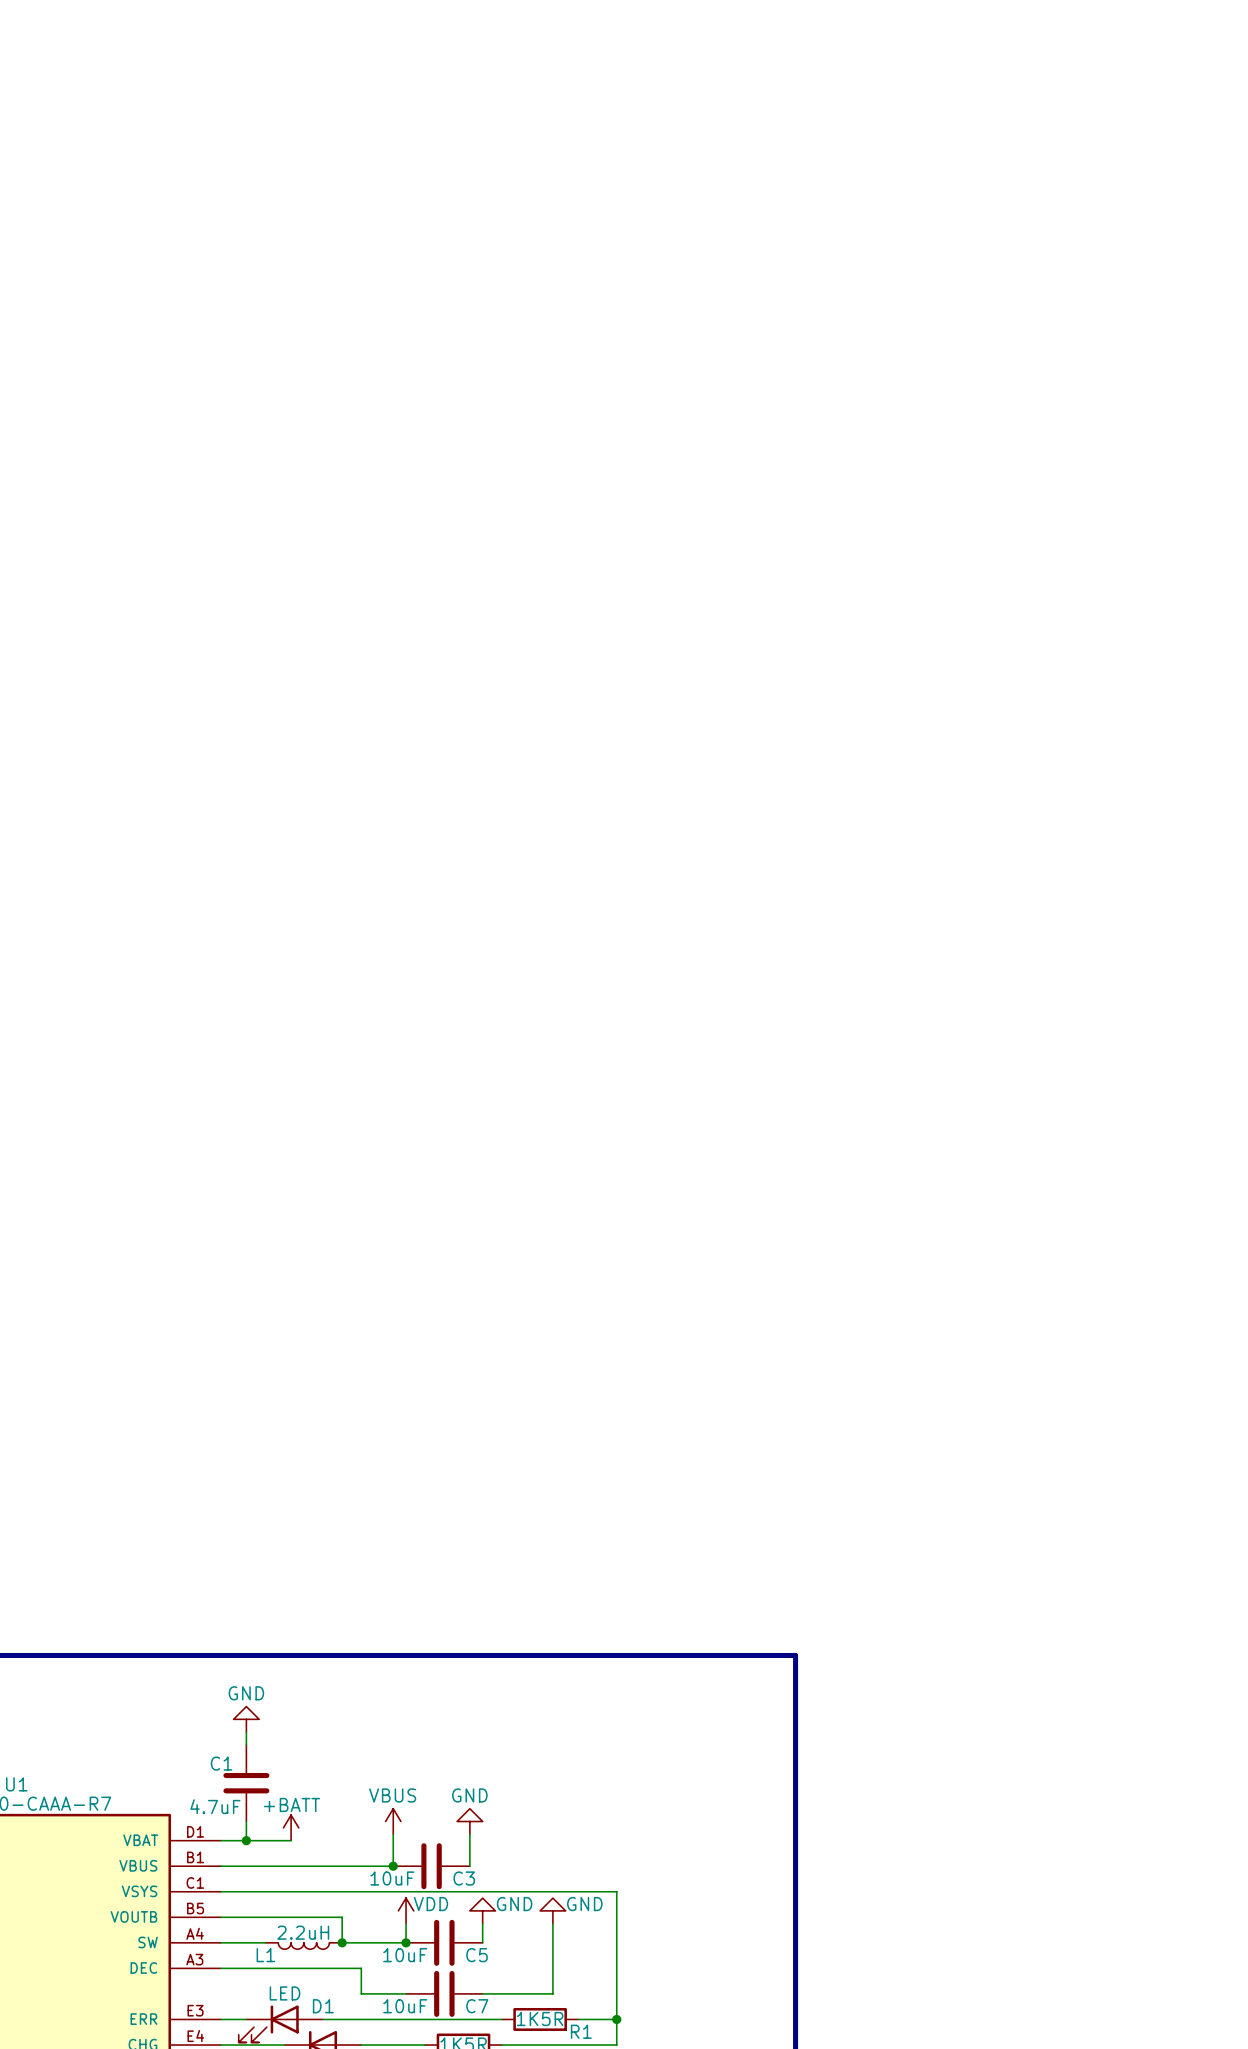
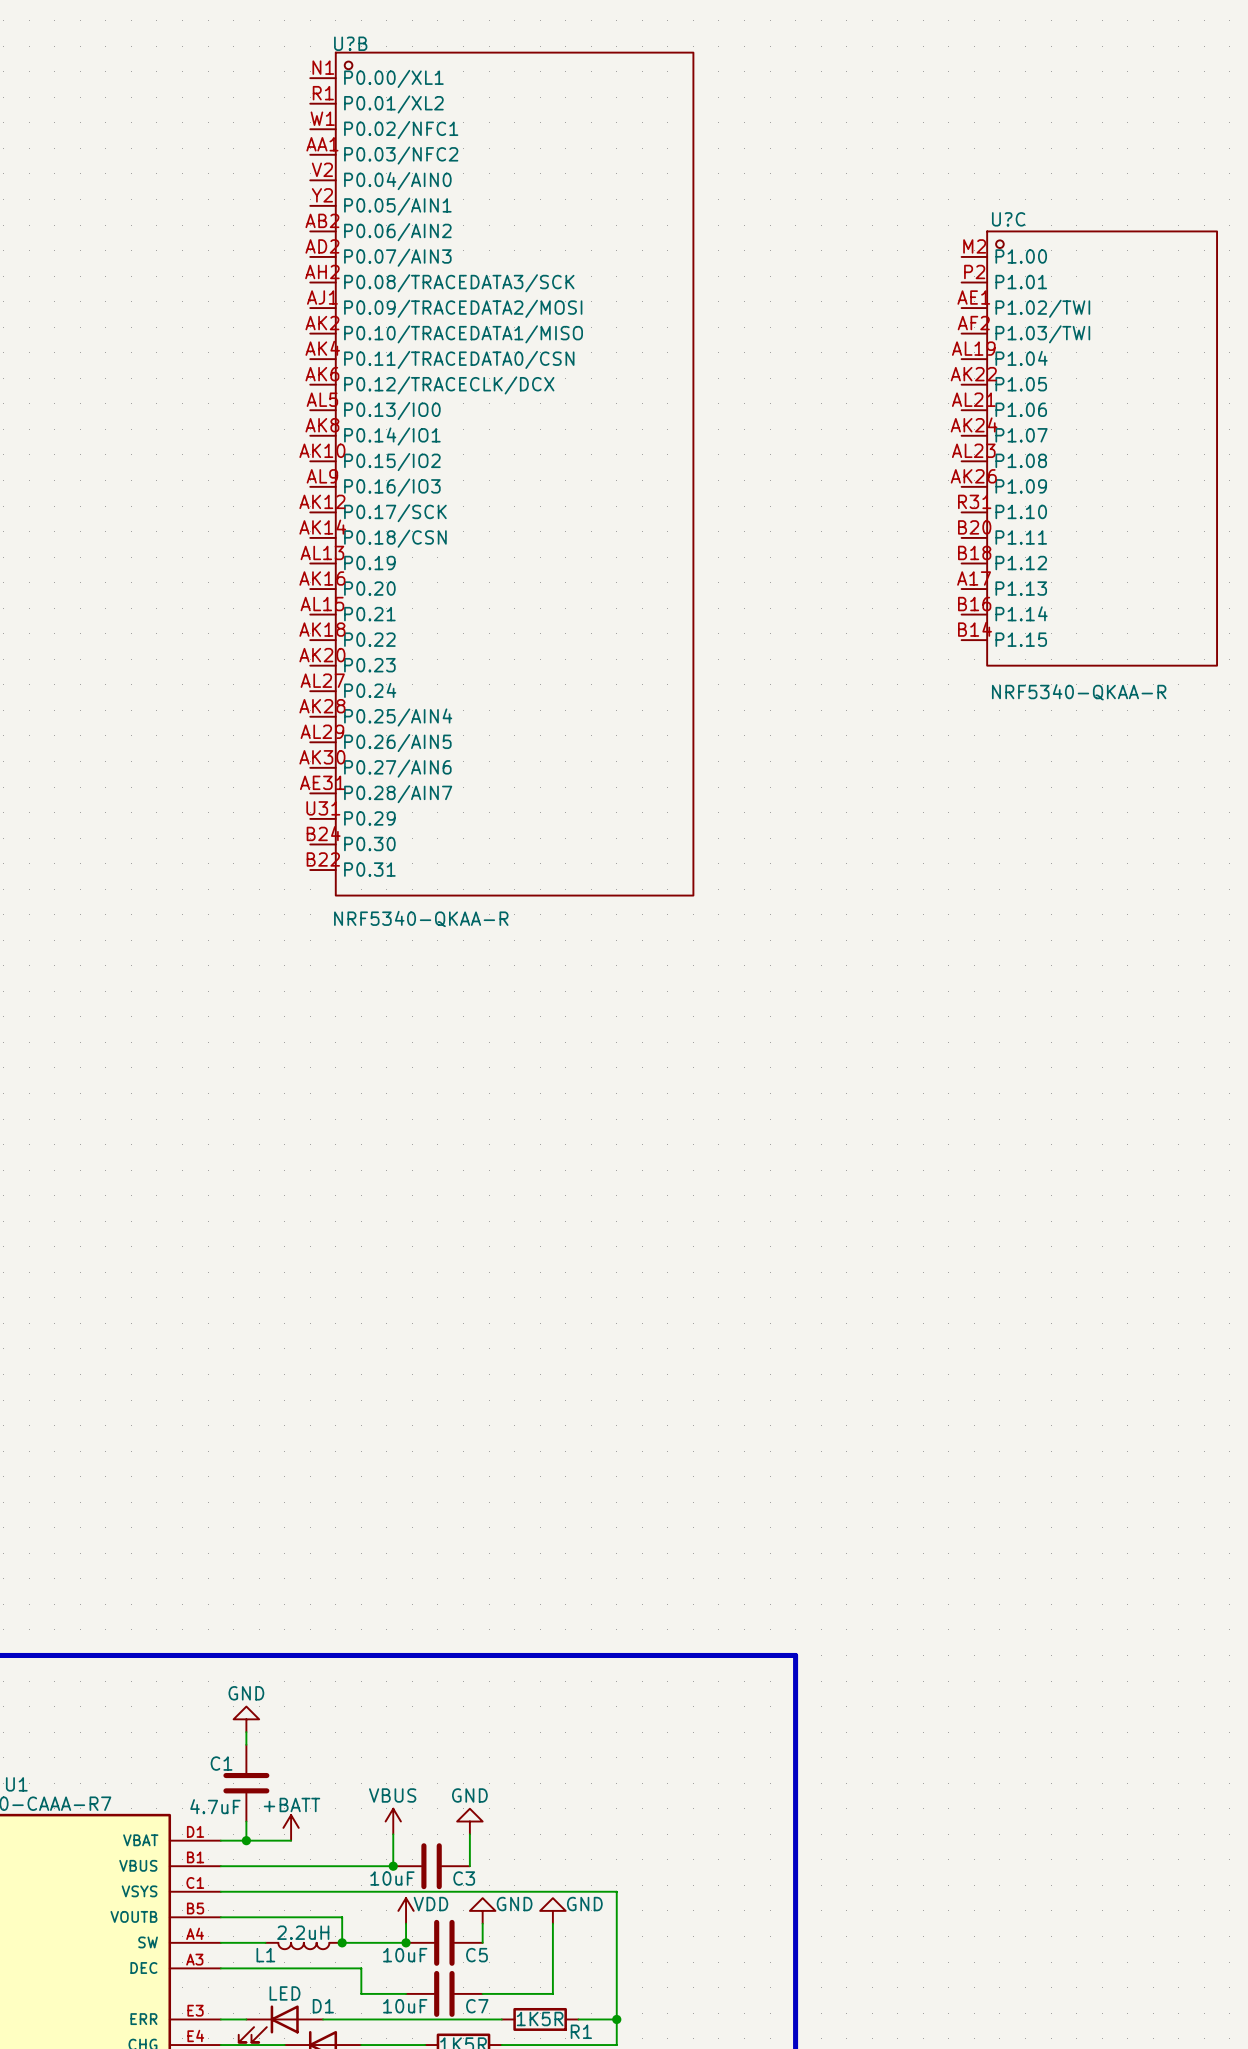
U?C: none -> NRF5340-QKAA-R (1089, 448)
U?B: none -> NRF5340-QKAA-R (501, 474)

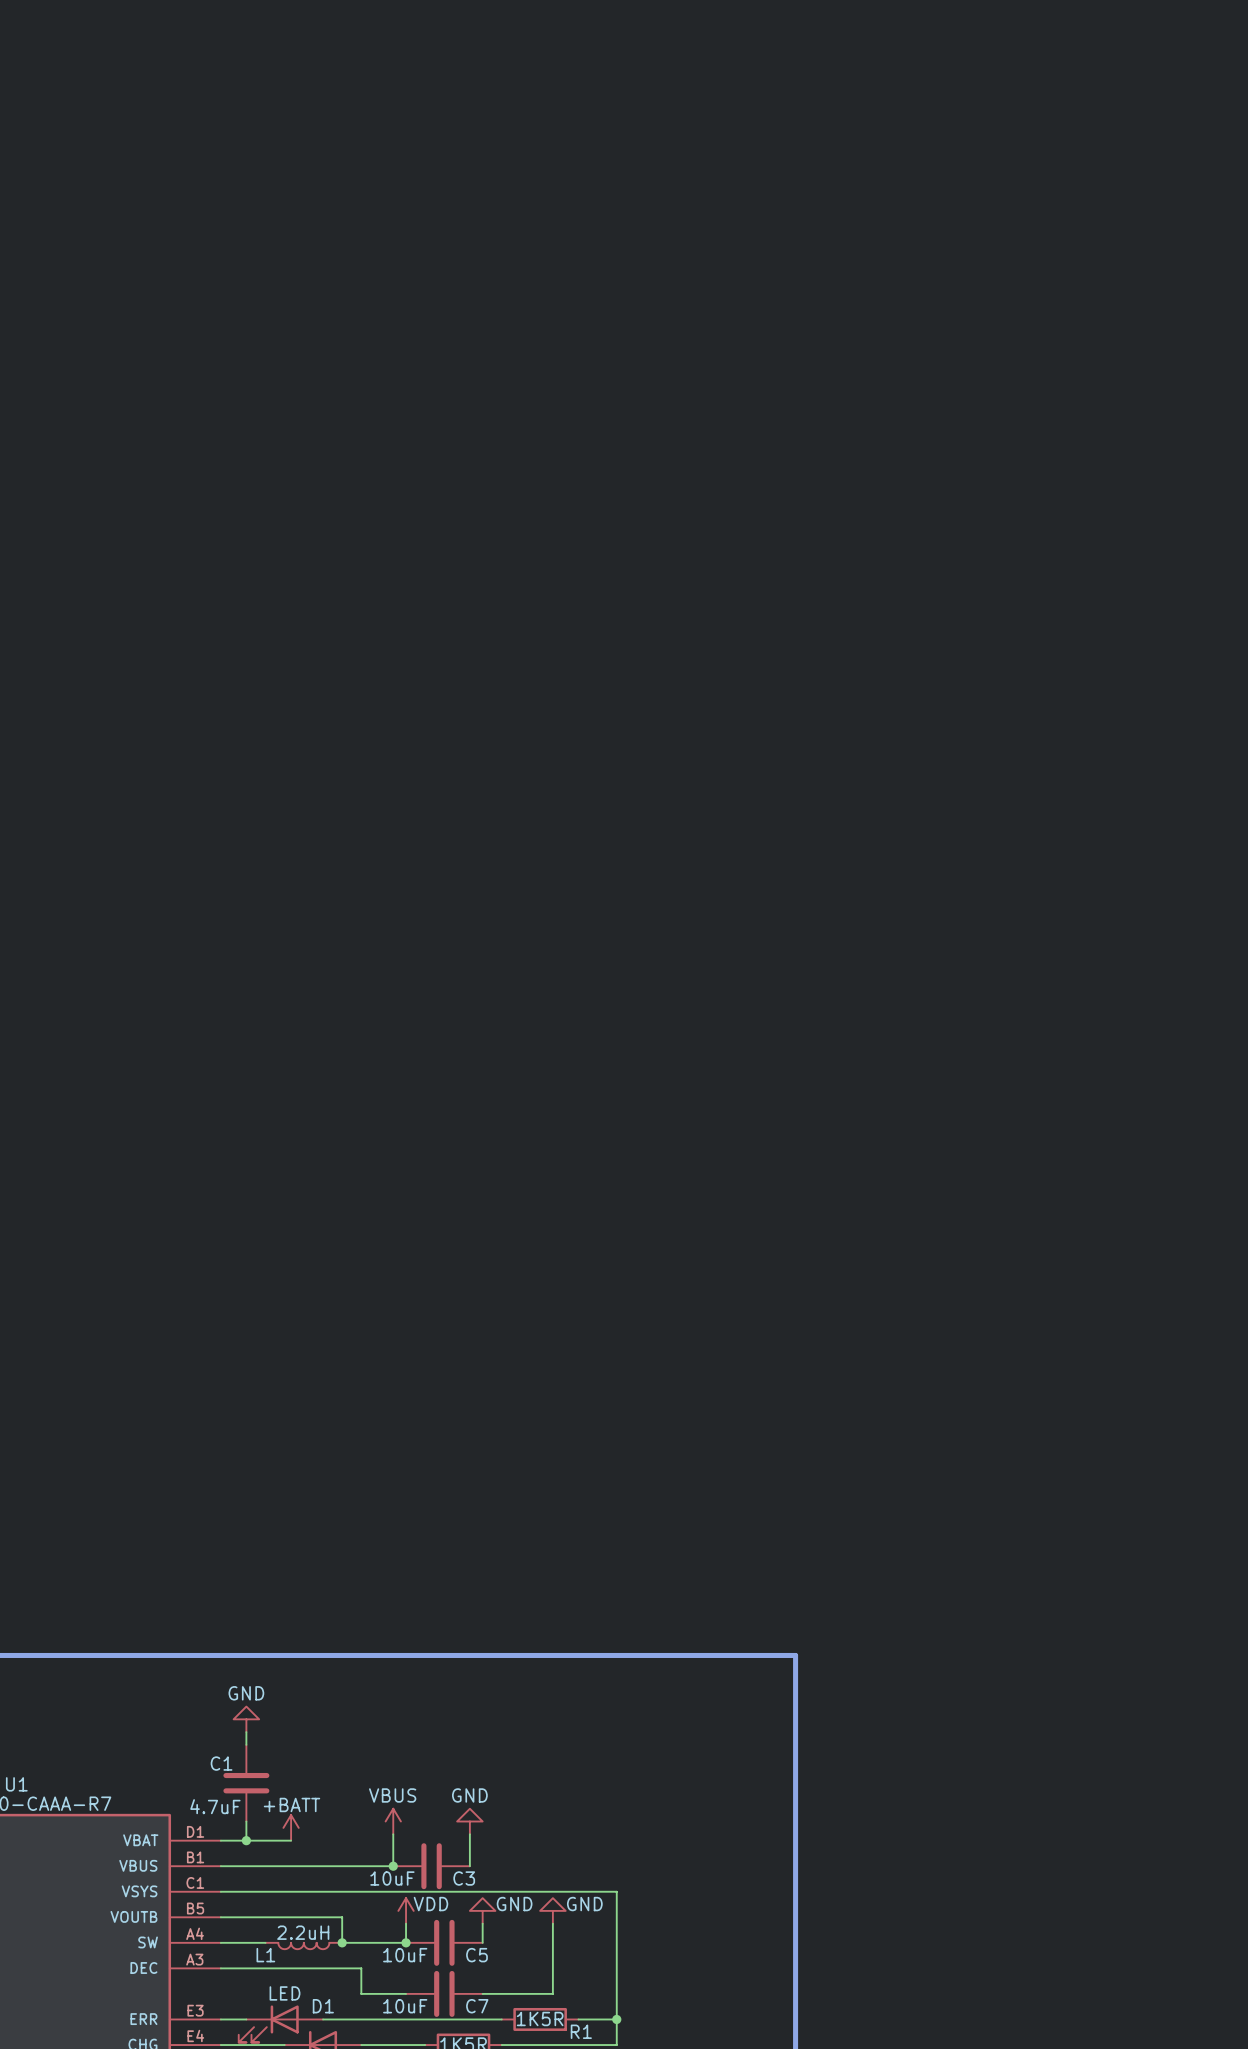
U?C: NRF5340-QKAA-R (1089, 448) -> none
U?B: NRF5340-QKAA-R (501, 474) -> none

